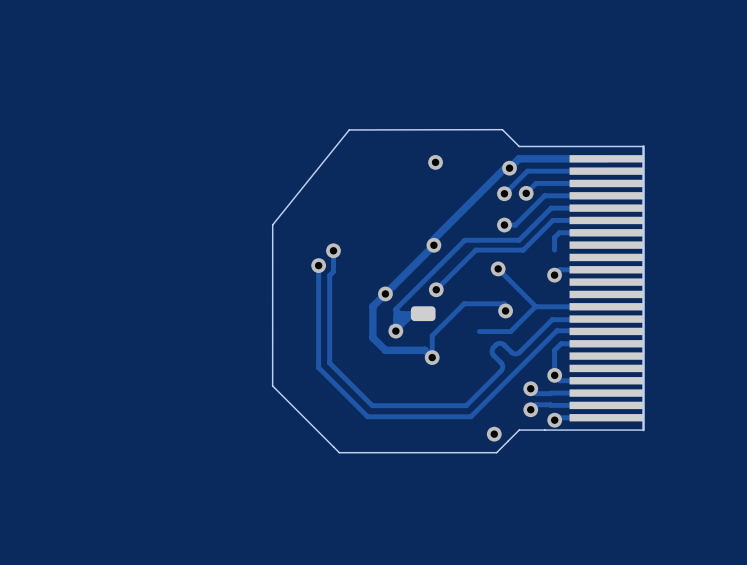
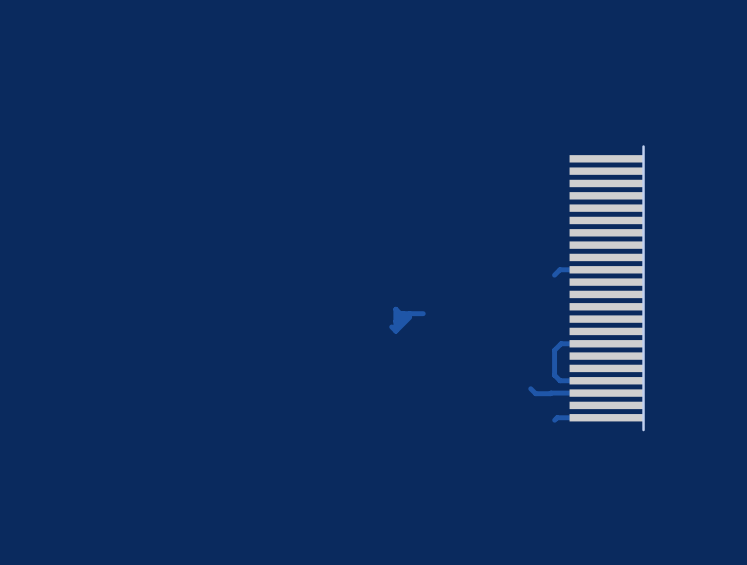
board edge: (643, 146) (519, 146) (502, 129) (349, 129) (272, 224) (272, 385) (339, 452) (496, 452) (519, 430) (643, 430) -> none
track: (606, 158) (518, 158) (509, 168) (504, 168) (433, 239) (433, 245) (372, 306) (372, 337) (385, 350) (424, 350) (432, 357) (432, 335) (464, 303) (504, 303) (507, 306) (505, 310) -> none
via: (435, 162) -> none
via: (509, 168) -> none
track: (606, 171) (527, 171) (504, 193) -> none
track: (606, 183) (536, 183) (526, 193) -> none
via: (504, 193) -> none
via: (526, 193) -> none
track: (606, 195) (544, 195) (515, 225) (504, 225) -> none
track: (606, 208) (551, 208) (519, 240) (464, 240) (395, 309) -> none
track: (606, 220) (552, 220) (523, 250) (475, 250) (436, 289) -> none
via: (504, 225) -> none
track: (606, 232) (559, 232) (554, 237) (554, 250) -> none
via: (433, 245) -> none
track: (333, 250) (333, 271) (329, 275) (329, 363) (372, 405) (466, 405) (502, 369) (501, 363) (492, 352) (492, 348) (496, 344) (502, 343) (512, 353) (516, 353) (552, 319) (606, 319) -> none
via: (333, 250) -> none
track: (318, 265) (318, 367) (367, 416) (470, 416) (556, 330) (606, 331) -> none
via: (318, 265) -> none
track: (498, 268) (536, 306) (606, 306) -> none
via: (498, 268) -> none
via: (554, 275) -> none
via: (436, 289) -> none
via: (385, 293) -> none
track: (535, 306) (510, 331) (479, 331) -> none
via: (505, 310) -> none
part: (423, 313) -> none
via: (395, 331) -> none
via: (432, 357) -> none
via: (554, 375) -> none
via: (530, 388) -> none
track: (606, 405) (535, 404) (530, 409) -> none
via: (530, 409) -> none
via: (554, 420) -> none
via: (494, 434) -> none

